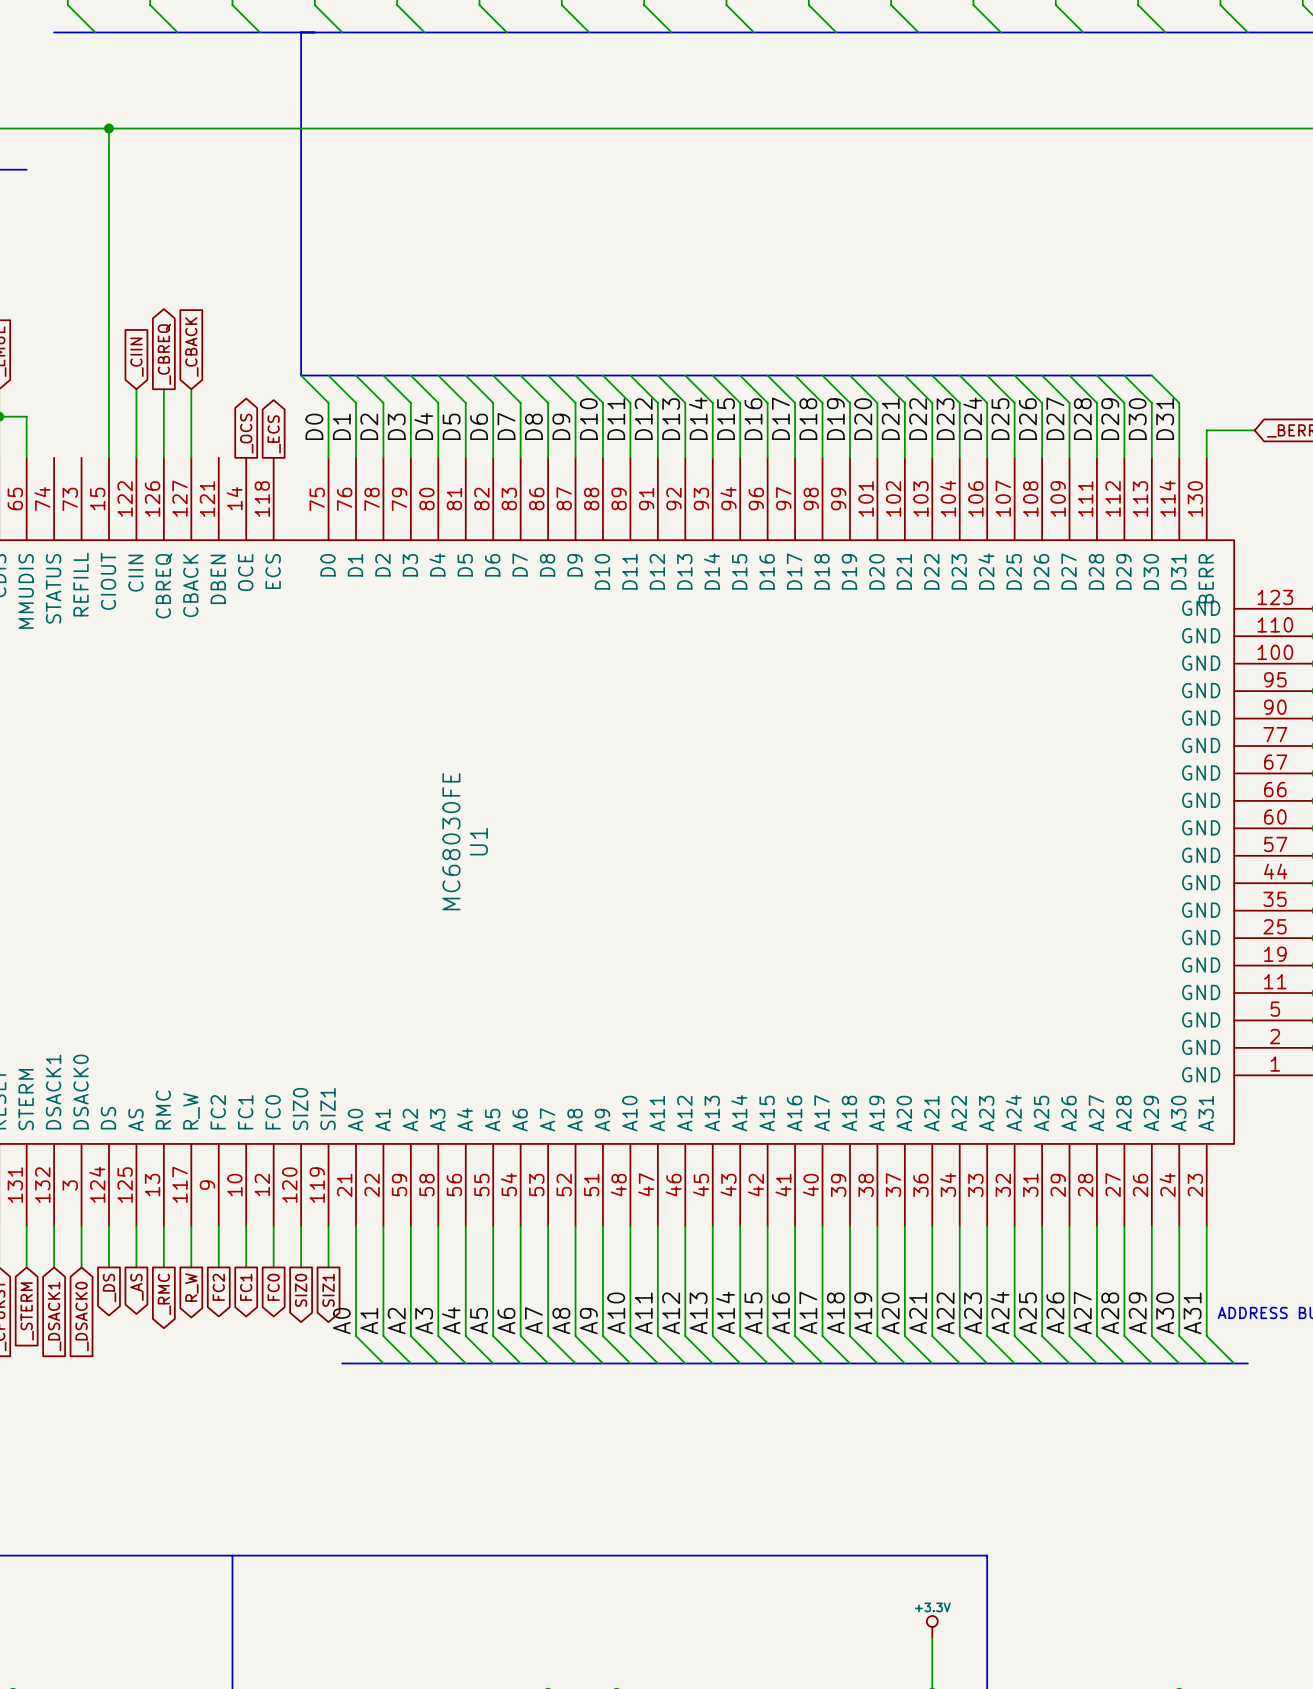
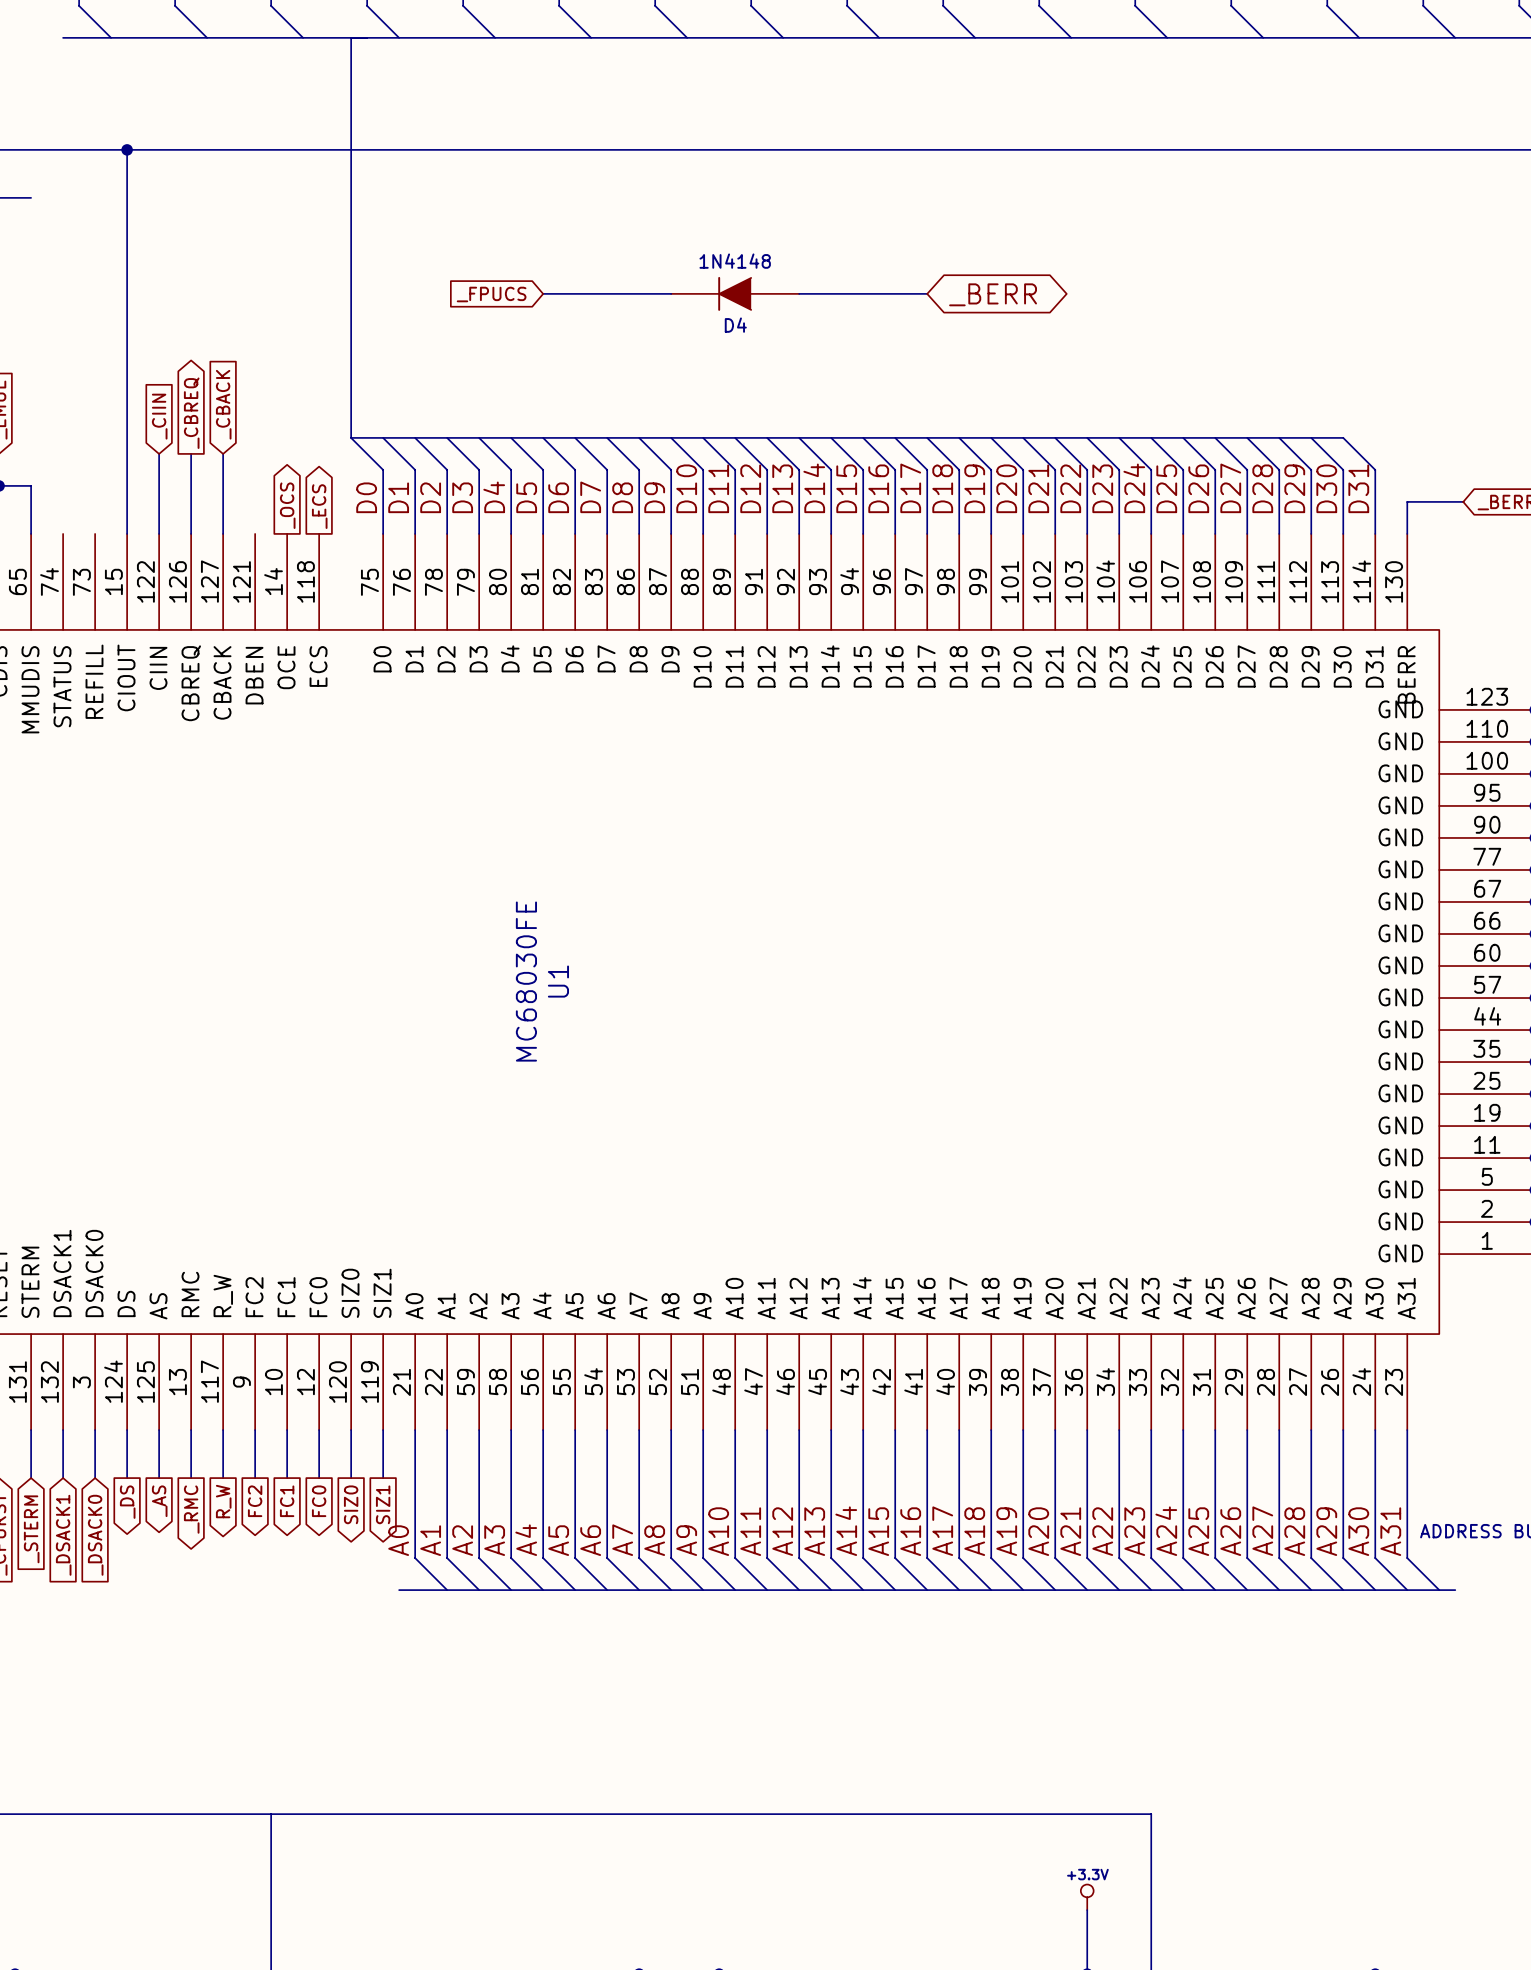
global label: none -> _FPUCS (491, 294)
wire: none -> (543, 293) (671, 293)
D4: none -> 1N4148 (735, 293)
wire: none -> (799, 293) (927, 293)
global label: none -> _BERR (993, 294)

